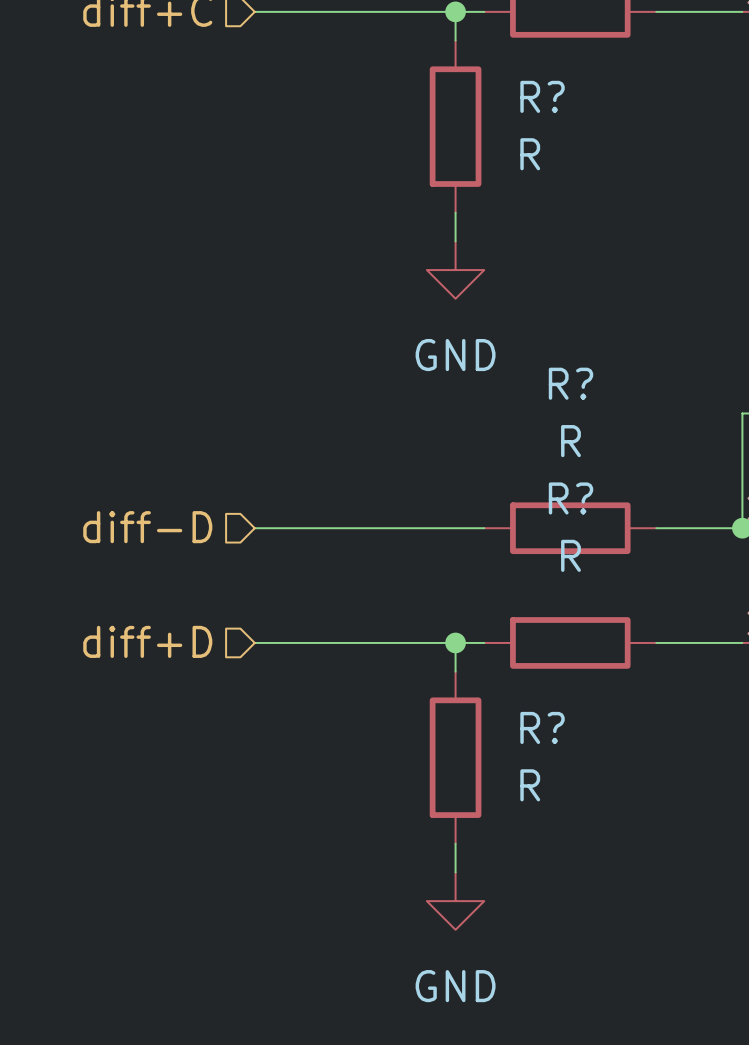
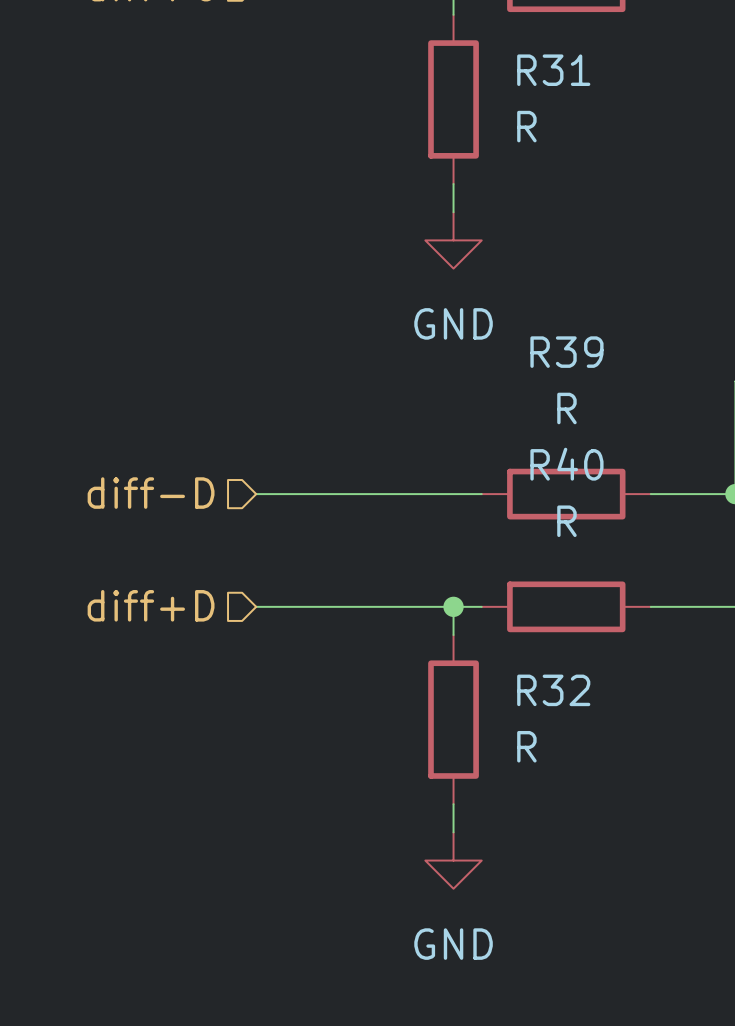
R? name: R? (542, 96) -> R31 (553, 70)
R? name: R? (570, 383) -> R39 (566, 352)
R? name: R? (570, 498) -> R40 (566, 464)
R? name: R? (542, 727) -> R32 (553, 690)

